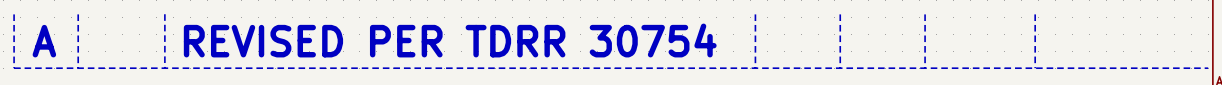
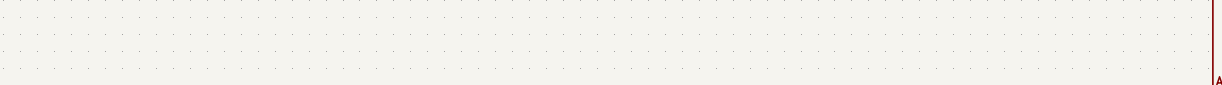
line: (14, 14) (14, 68) (1208, 68) -> none
line: (78, 14) (78, 68) -> none
line: (164, 14) (164, 68) -> none
line: (755, 14) (755, 68) -> none
line: (840, 14) (840, 68) -> none
line: (925, 14) (925, 68) -> none
line: (1035, 14) (1035, 68) -> none
text: A REVISED PER TDRR 30754 (374, 40) -> none

